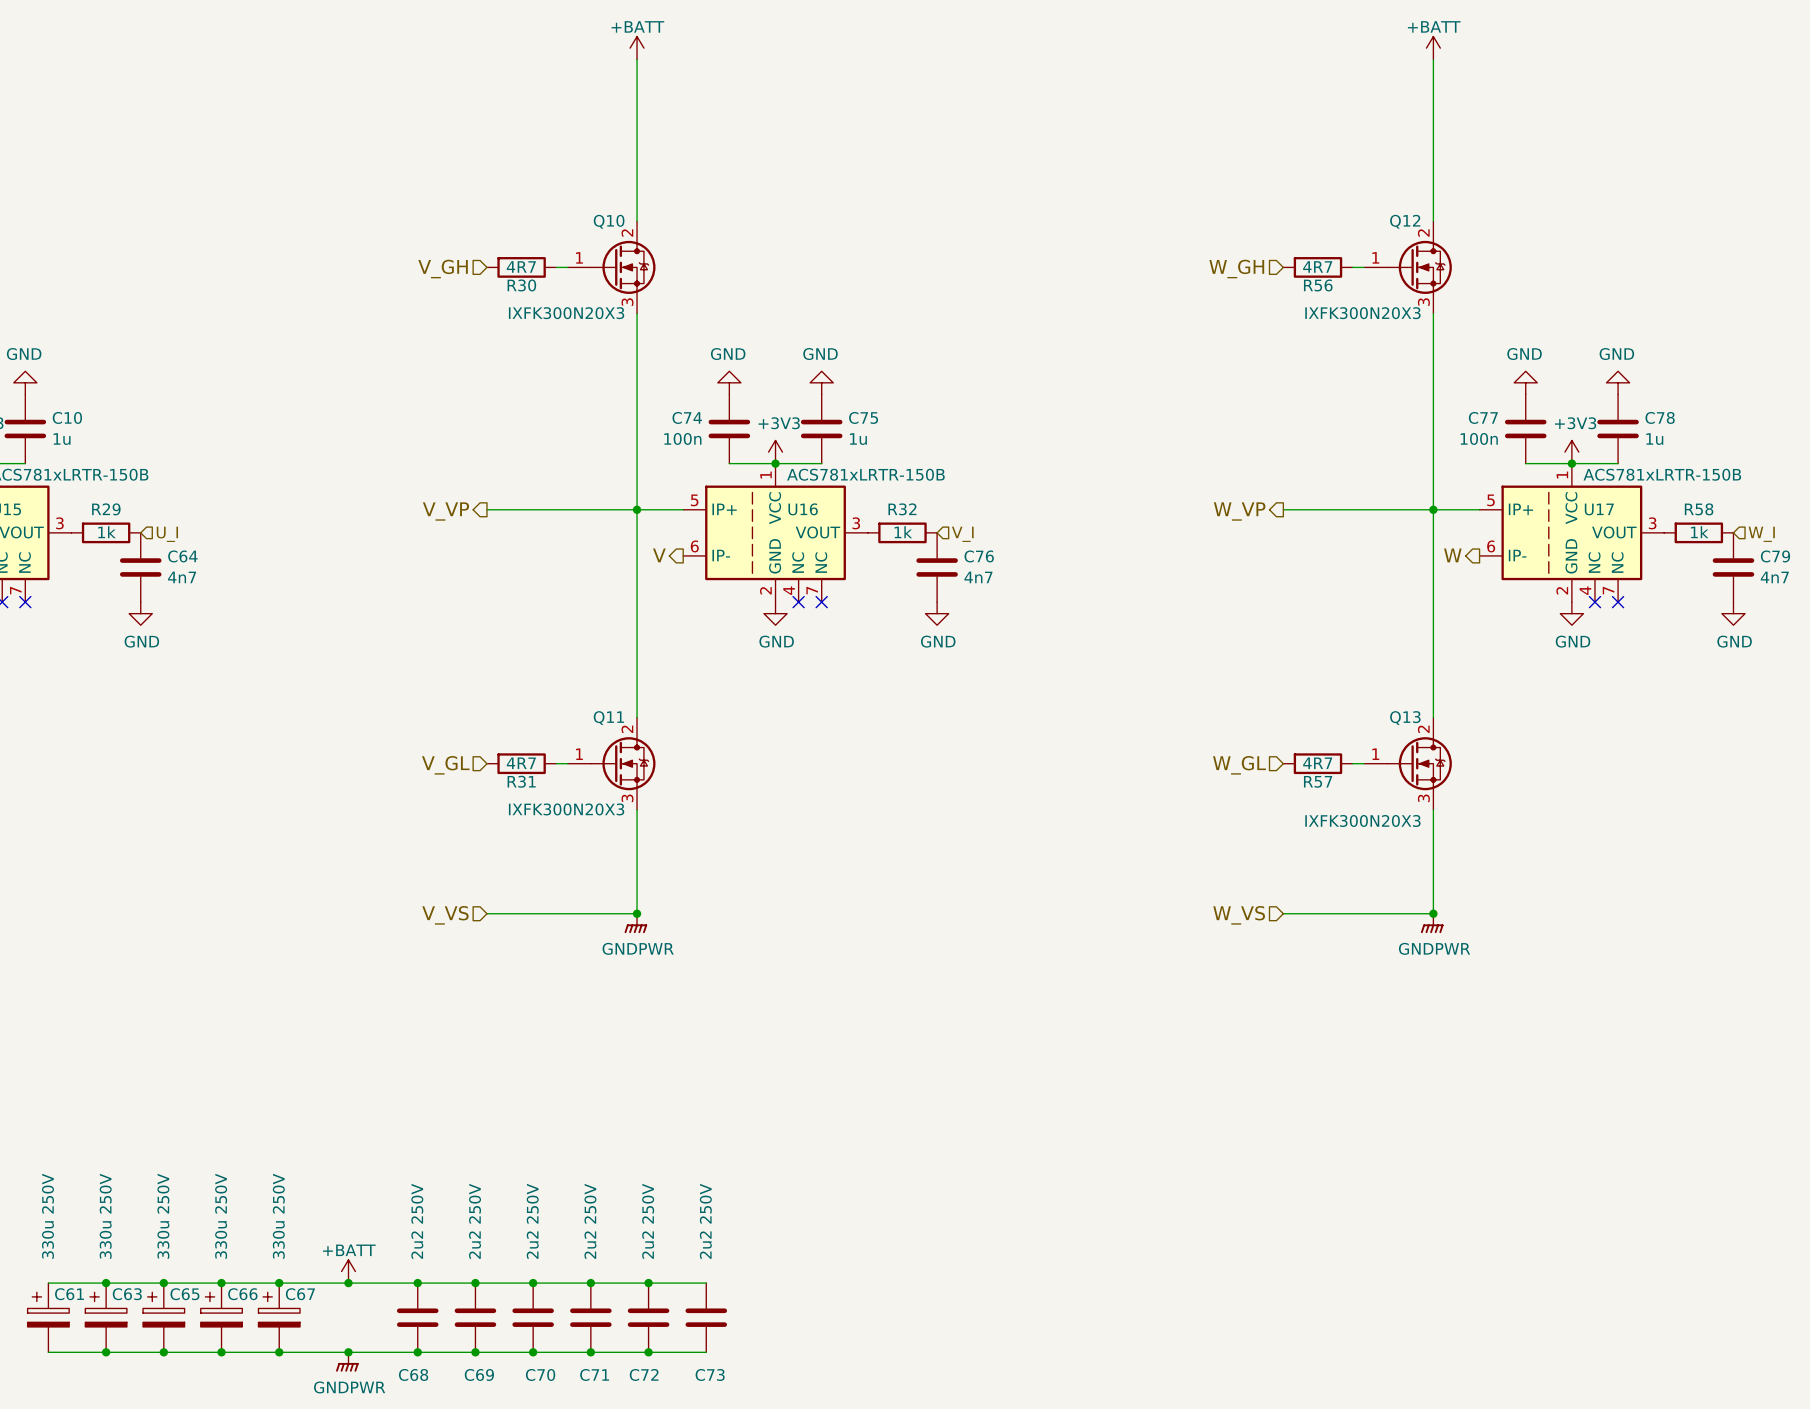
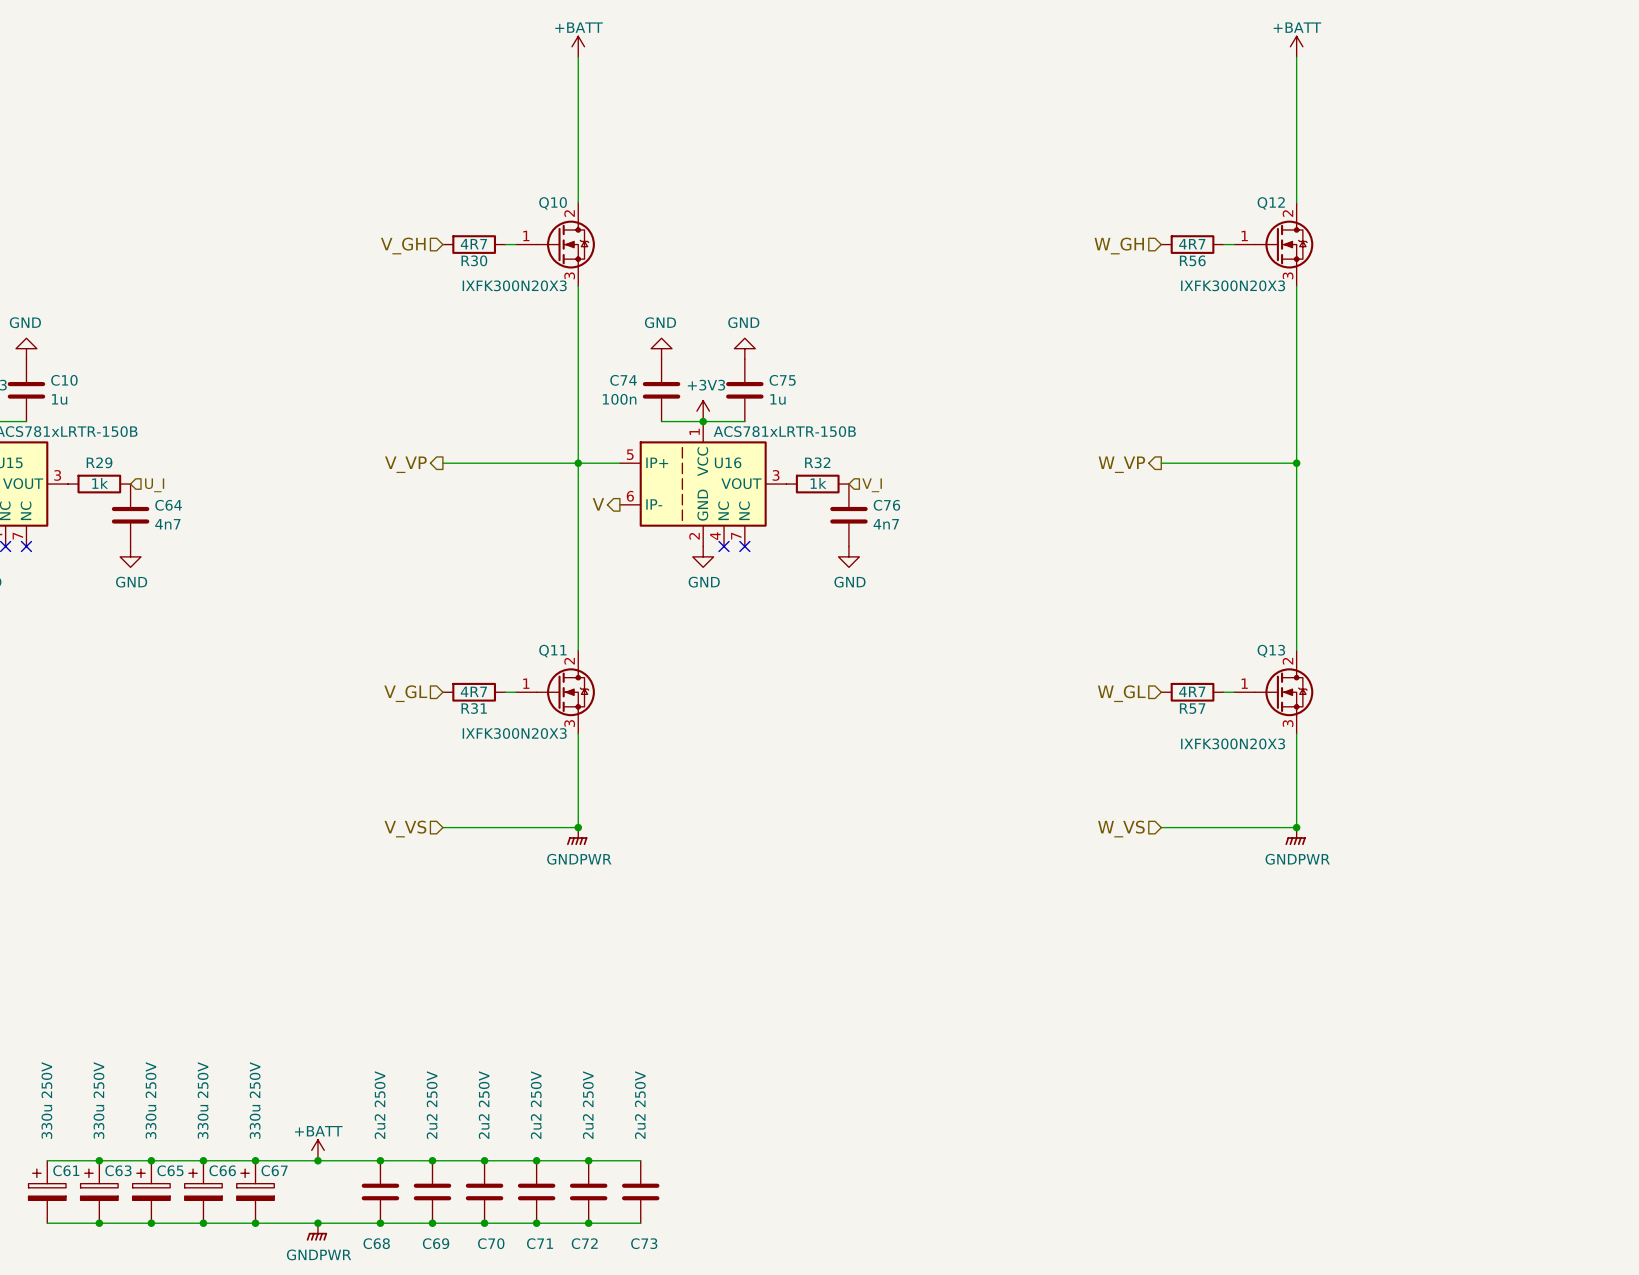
power symbol: GND (1525, 382) -> none
power symbol: GND (1618, 382) -> none
C77: 100n (1525, 428) -> none
C78: 1u (1618, 428) -> none
power symbol: +3V3 (1571, 452) -> none
wire: (1525, 463) (1618, 463) -> none
junction: (1571, 463) -> none
wire: (1433, 509) (1479, 509) -> none
U17: ACS781xLRTR-150B (1571, 532) -> none
R58: 1k (1698, 532) -> none
hierarchical label: W_I (1761, 534) -> none
hierarchical label: W (1452, 555) -> none
C79: 4n7 (1733, 567) -> none
no-connect mark: (1594, 602) -> none
no-connect mark: (1618, 602) -> none
power symbol: GND (1571, 613) -> none
power symbol: GND (1733, 613) -> none

